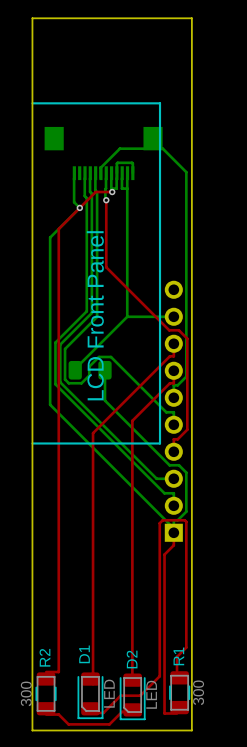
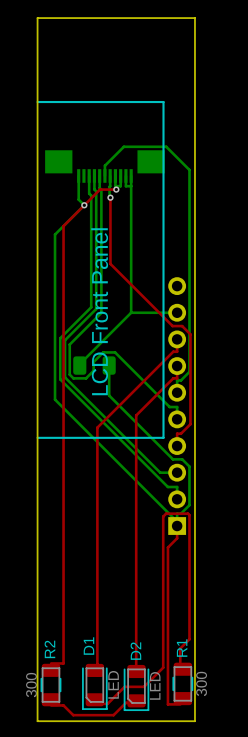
part: (103, 153) -> none
part: none -> (104, 166)
bottom track: (116, 173) (117, 162) (132, 162) (132, 173) -> none

